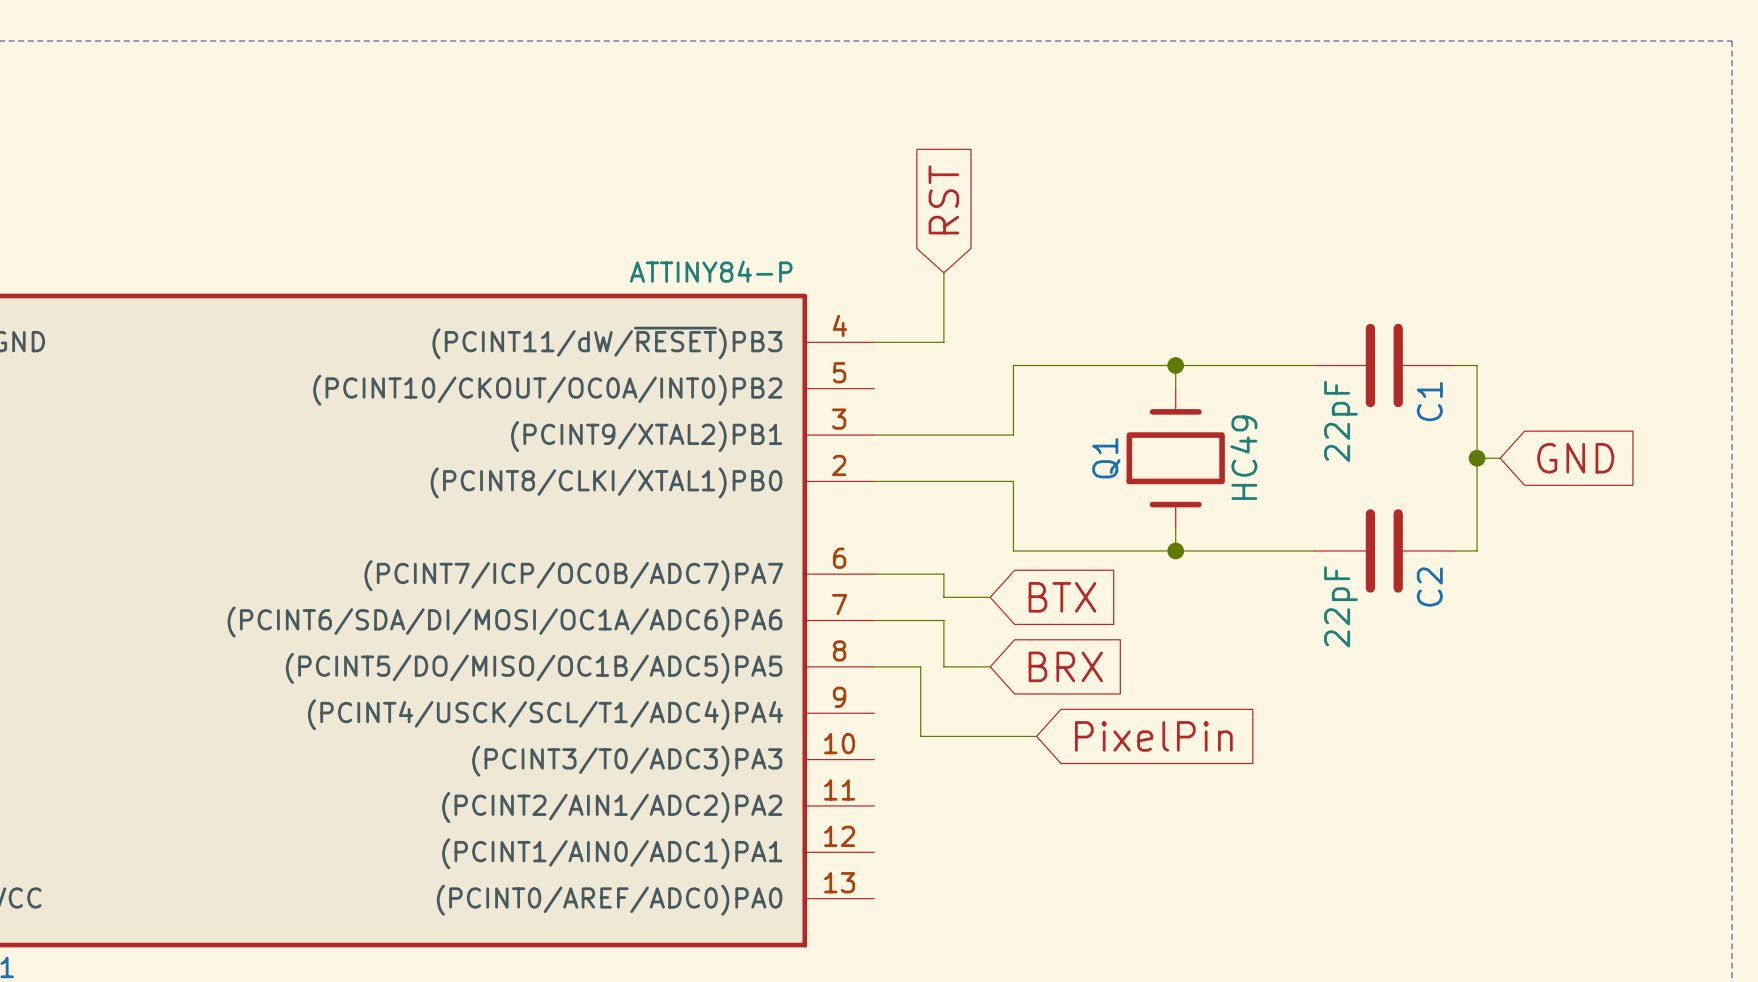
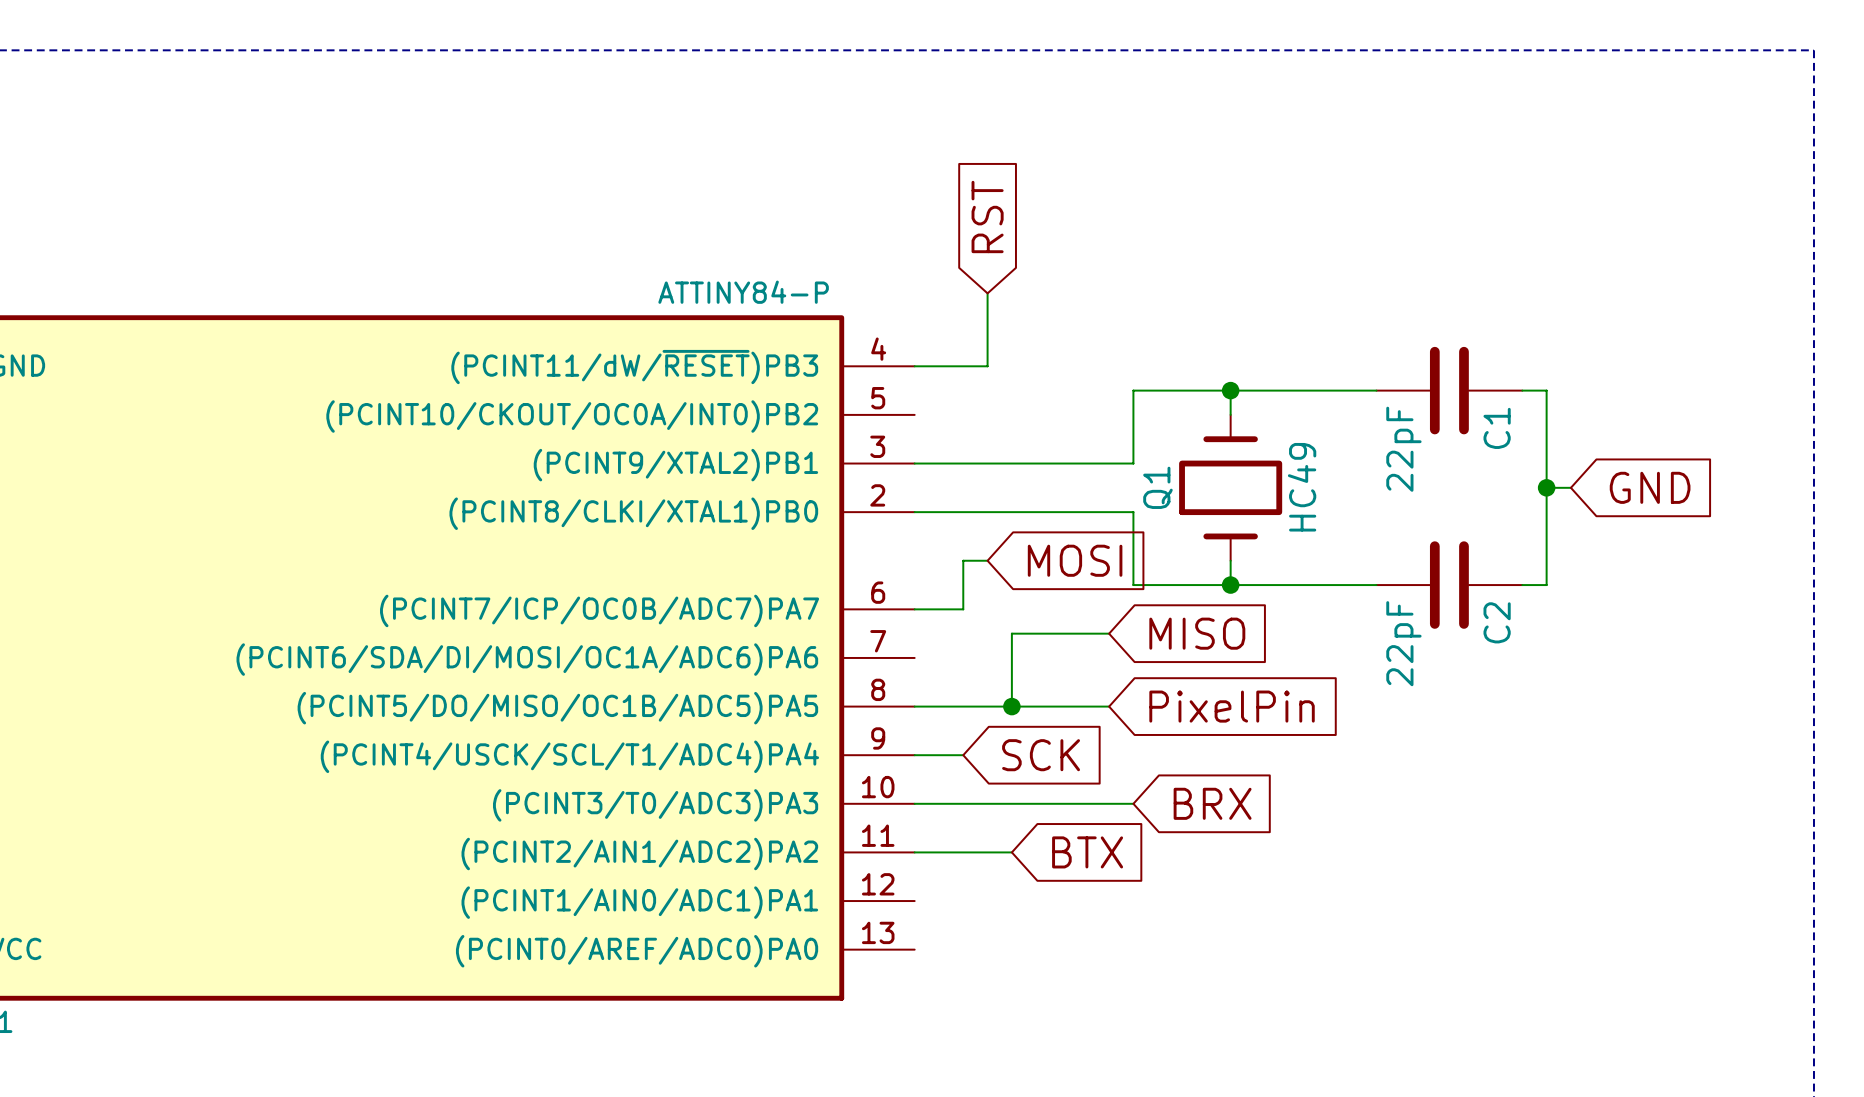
wire: (1082, 365) (1013, 365) (1013, 435) -> (1133, 390) (1133, 463) (1060, 463)
wire: (1013, 481) (1013, 550) (1082, 550) -> (1060, 512) (1133, 512) (1133, 585)
global label: none -> MOSI (1075, 560)
wire: (920, 574) (943, 574) (943, 597) (967, 597) -> (963, 609) (963, 560) (987, 560)
wire: none -> (1011, 633) (1011, 706)
wire: none -> (1036, 633) (1109, 633)
global label position: BTX (1062, 597) -> BTX (1087, 852)
global label: none -> MISO (1197, 633)
wire: (874, 620) (943, 620) (943, 666) -> (963, 706) (987, 706)
wire: (920, 666) (920, 736) (1036, 736) -> none
junction: none -> (1011, 706)
wire: none -> (1036, 706) (1109, 706)
global label position: BRX (1065, 666) -> BRX (1212, 803)
wire: none -> (914, 755) (963, 755)
global label: none -> SCK (1041, 755)
global label position: PixelPin (1153, 736) -> PixelPin (1232, 706)
wire: none -> (914, 803) (1133, 803)
wire: none -> (914, 852) (1011, 852)

